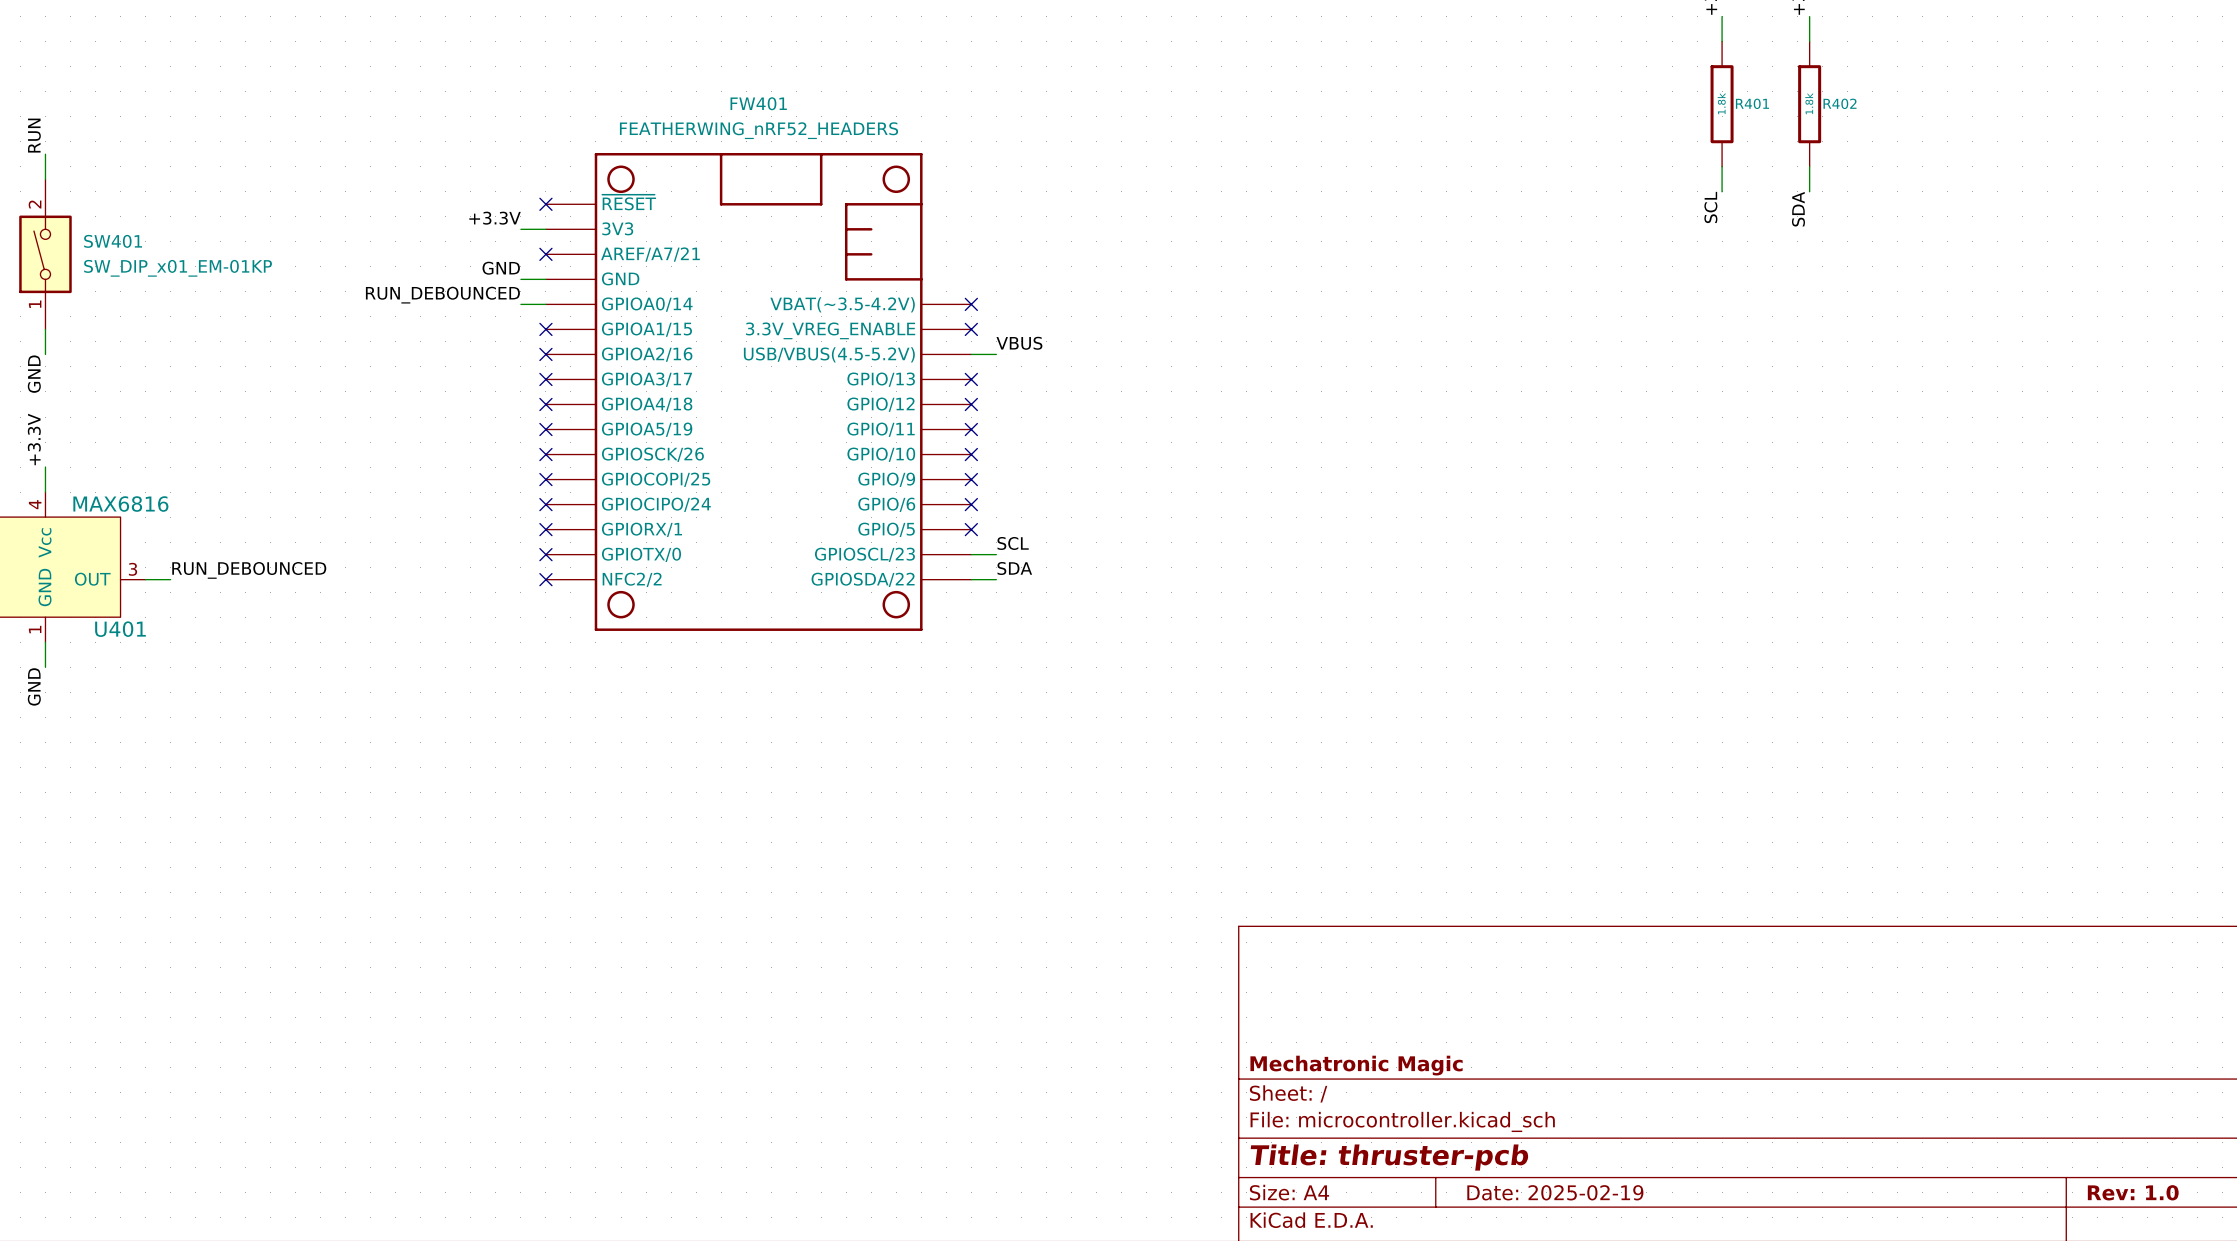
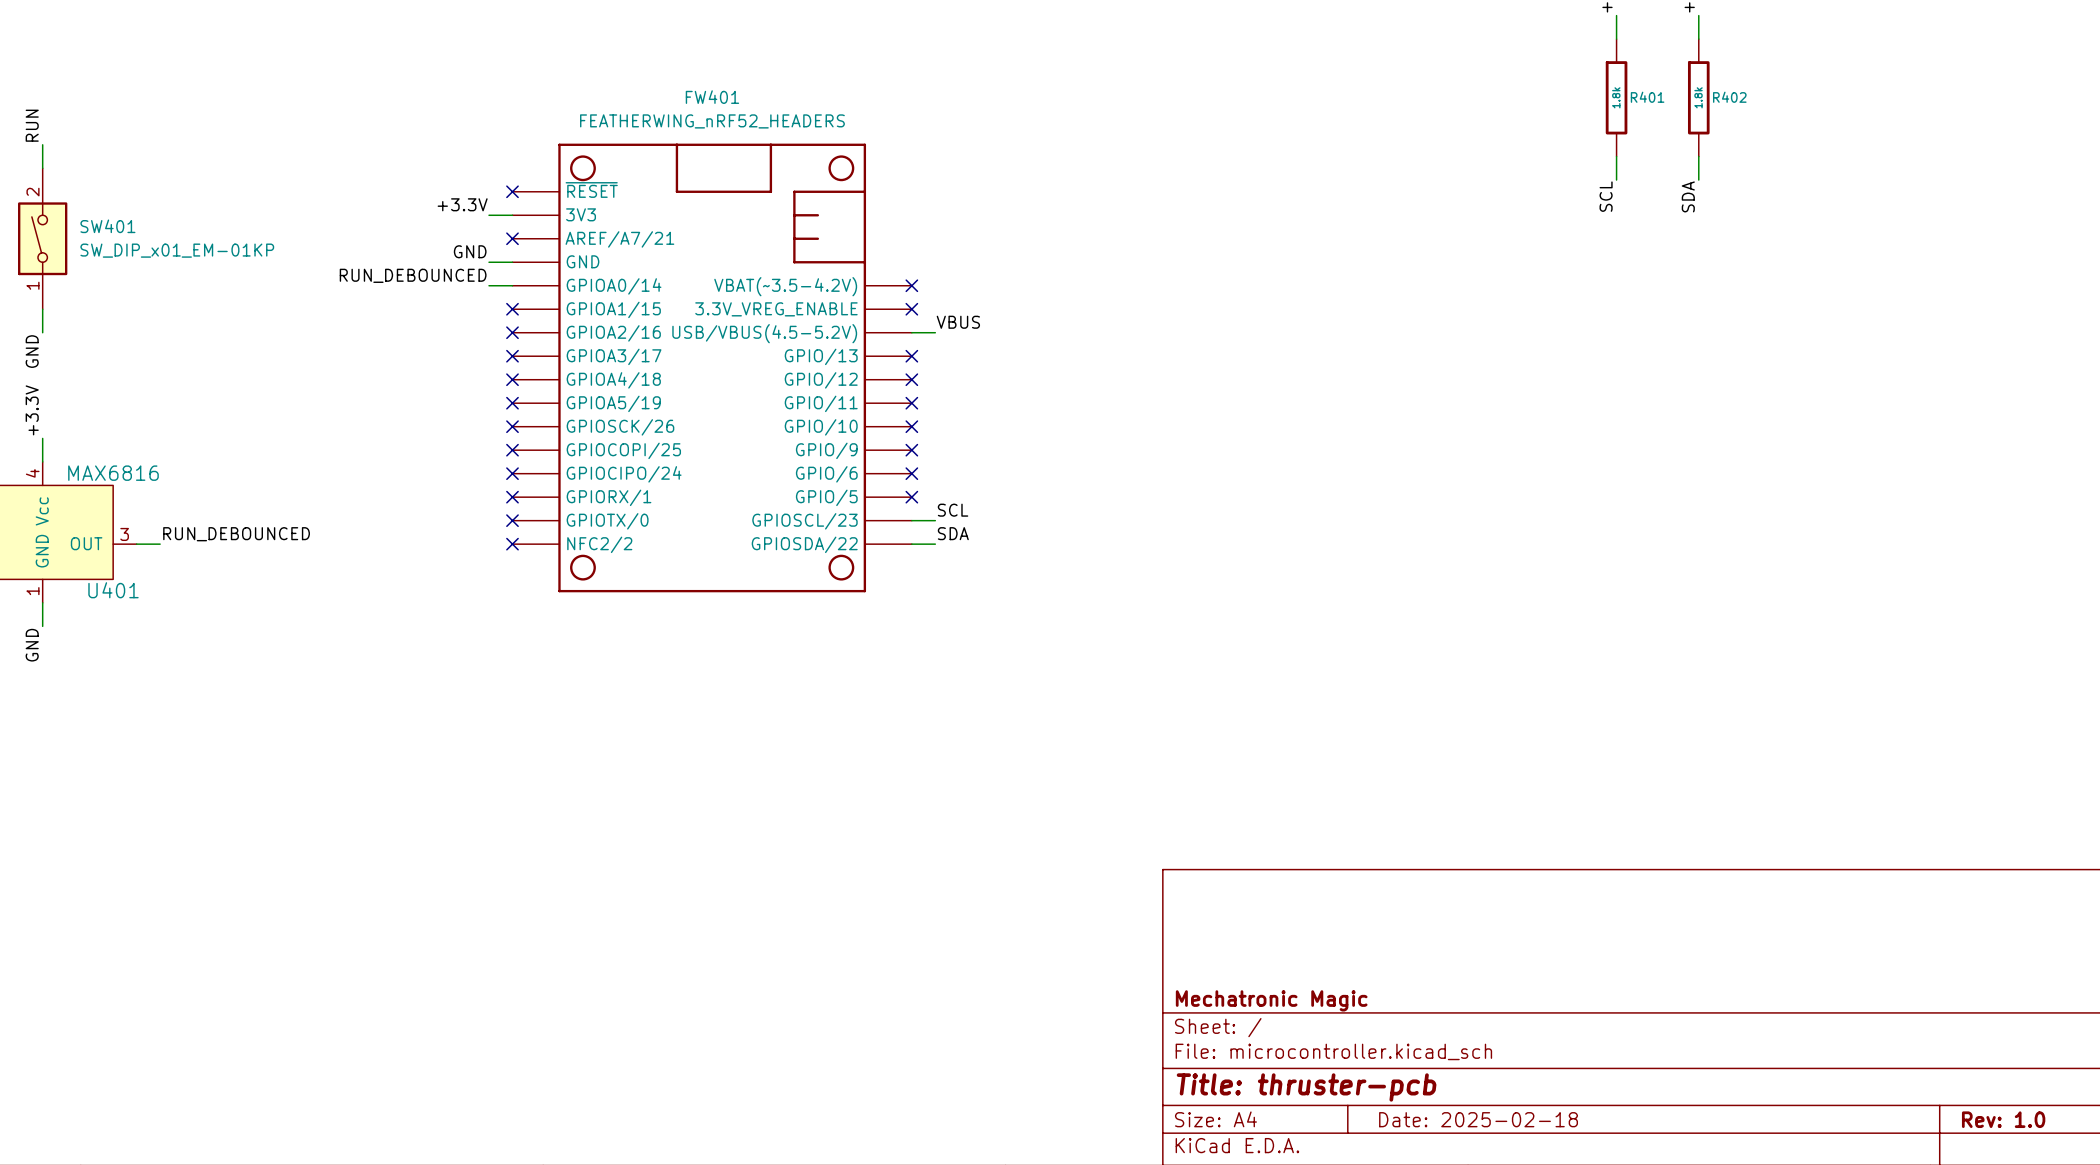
title block: Date: 2025-02-19 (1555, 1192) -> Date: 2025-02-18 (1478, 1119)

